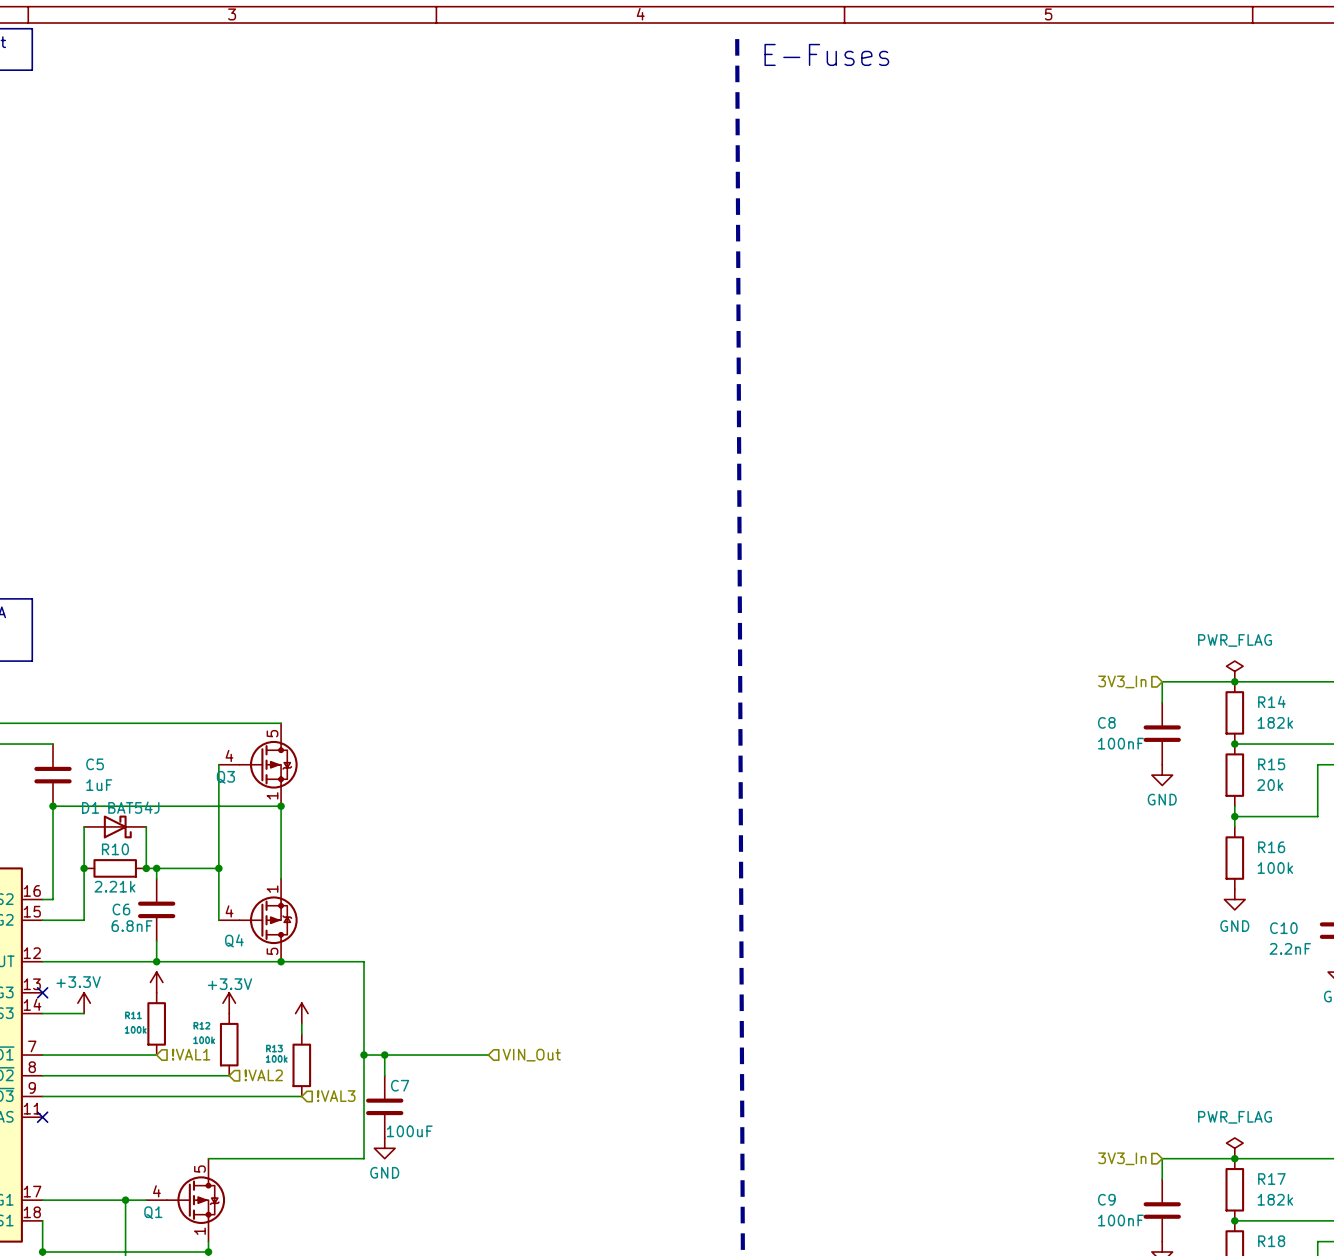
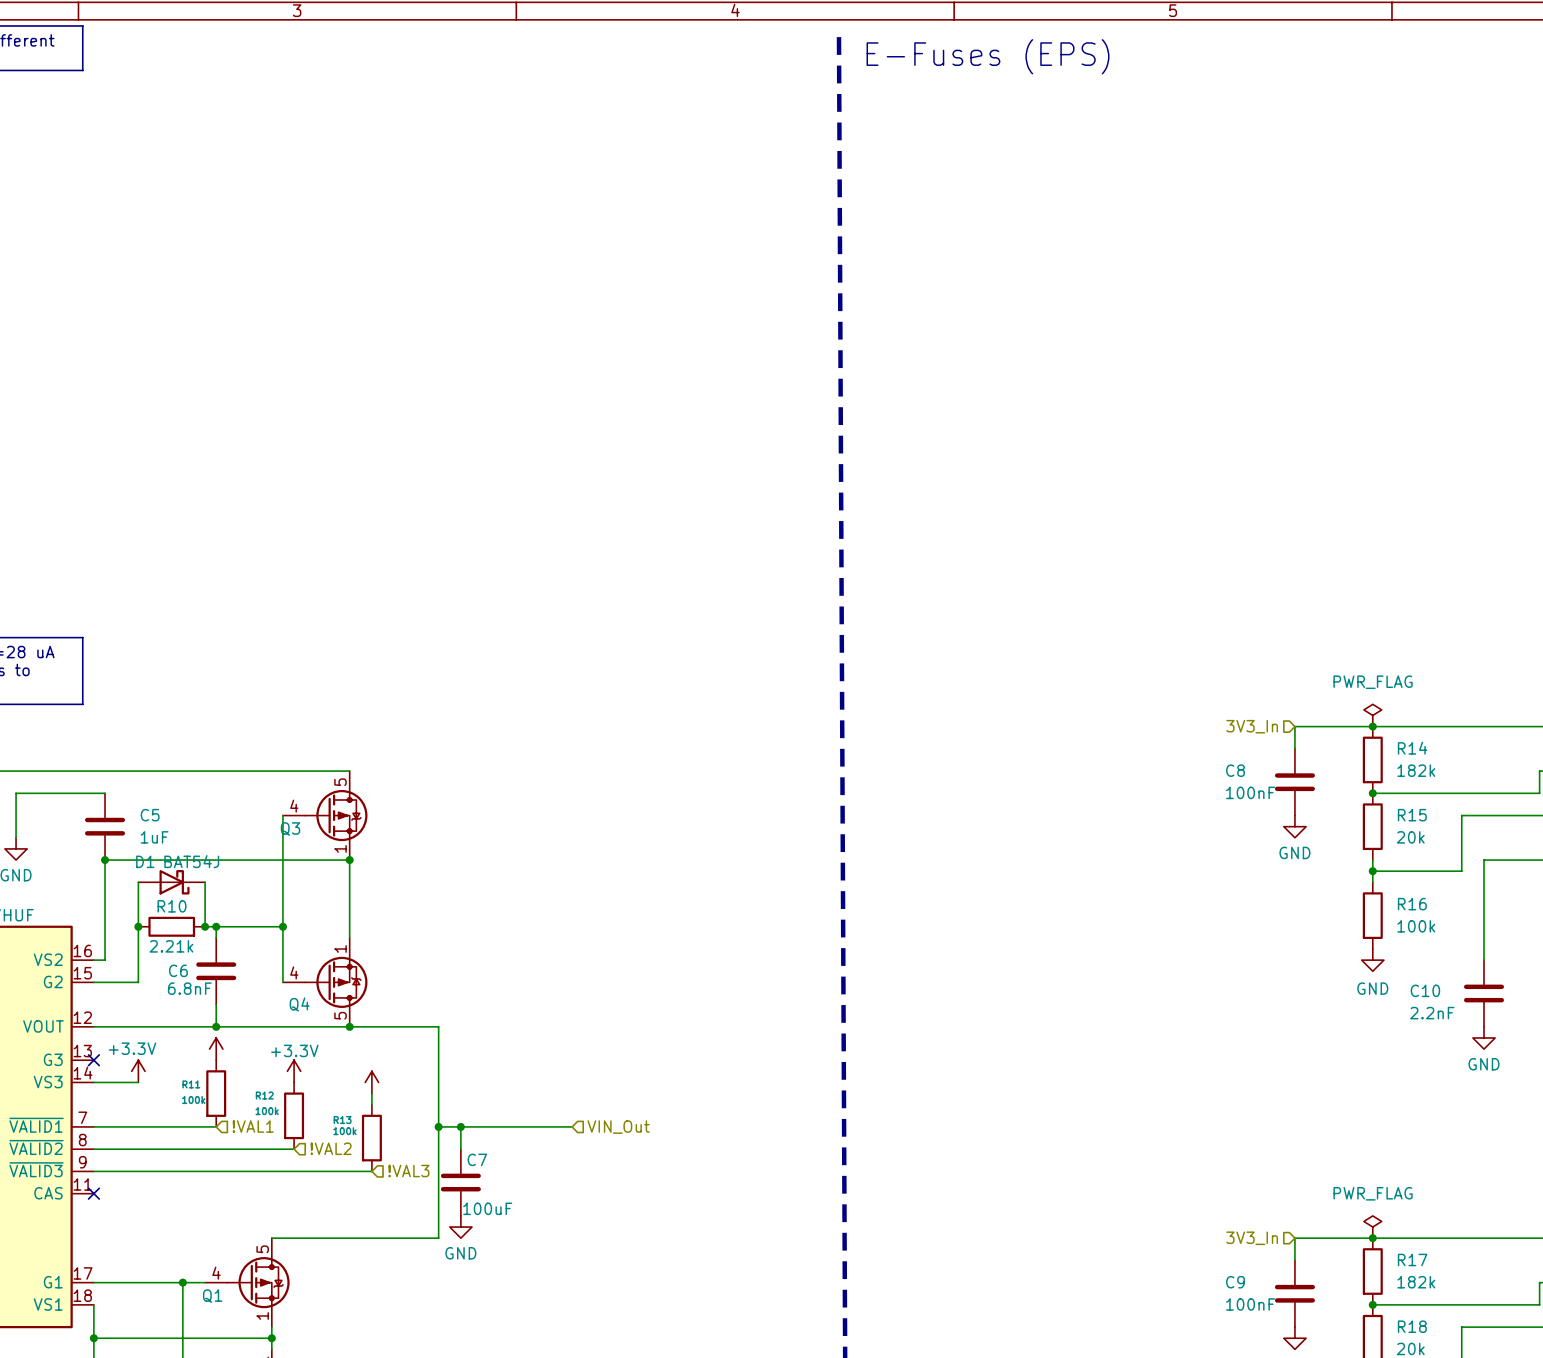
text: E-Fuses (826, 54) -> E-Fuses (EPS) (988, 56)

